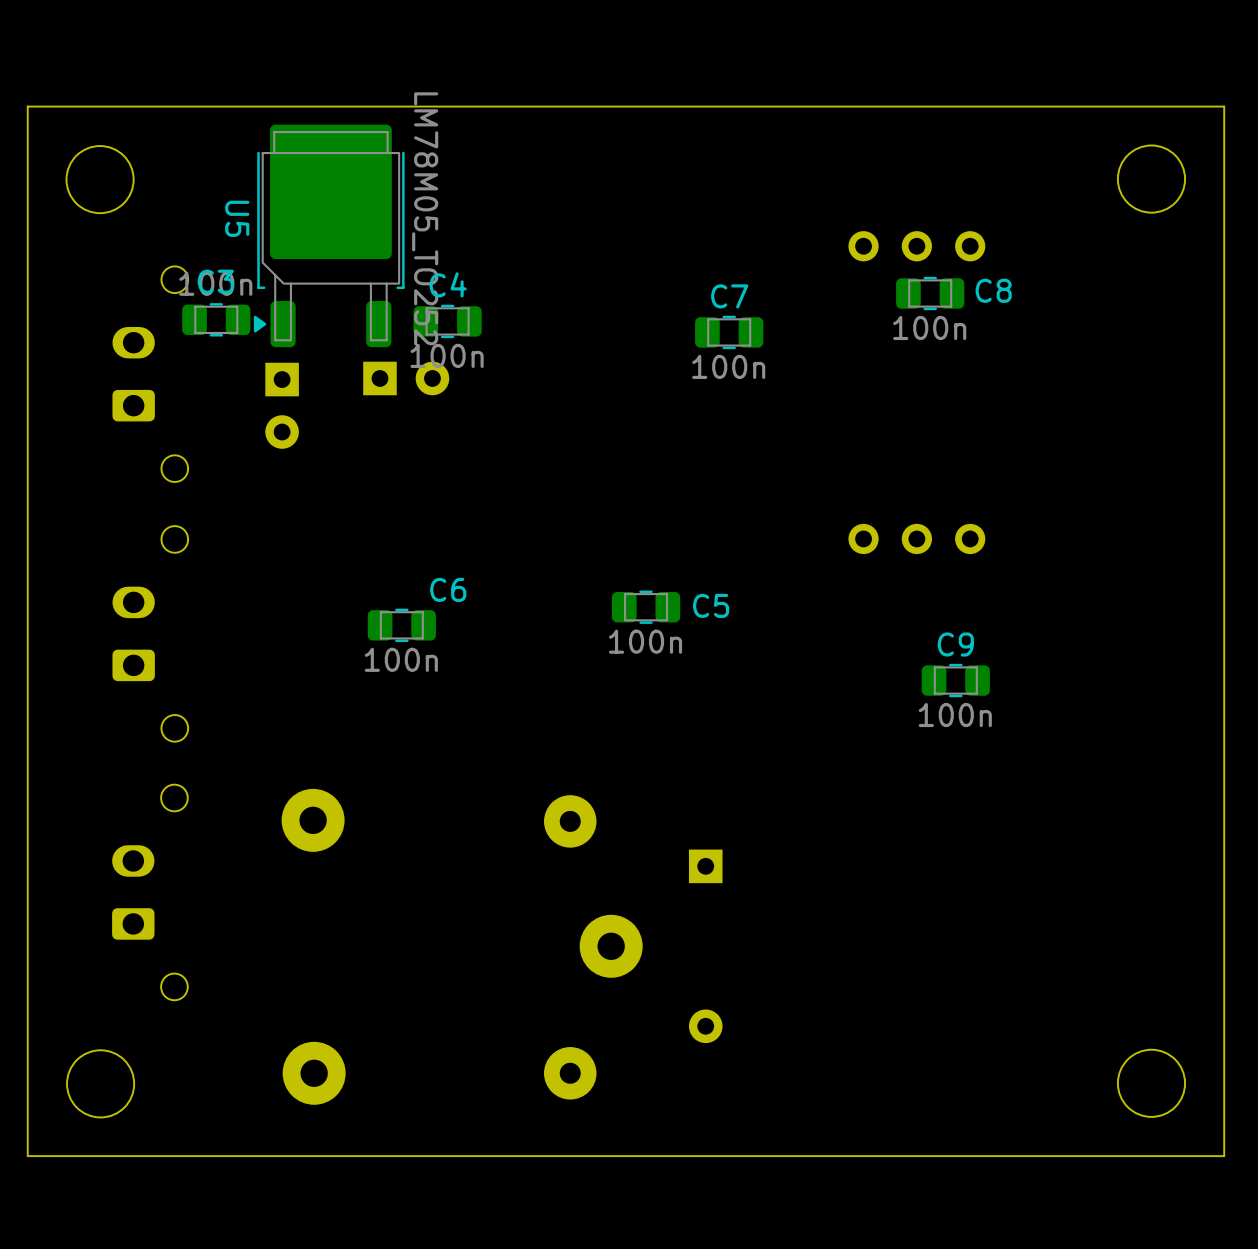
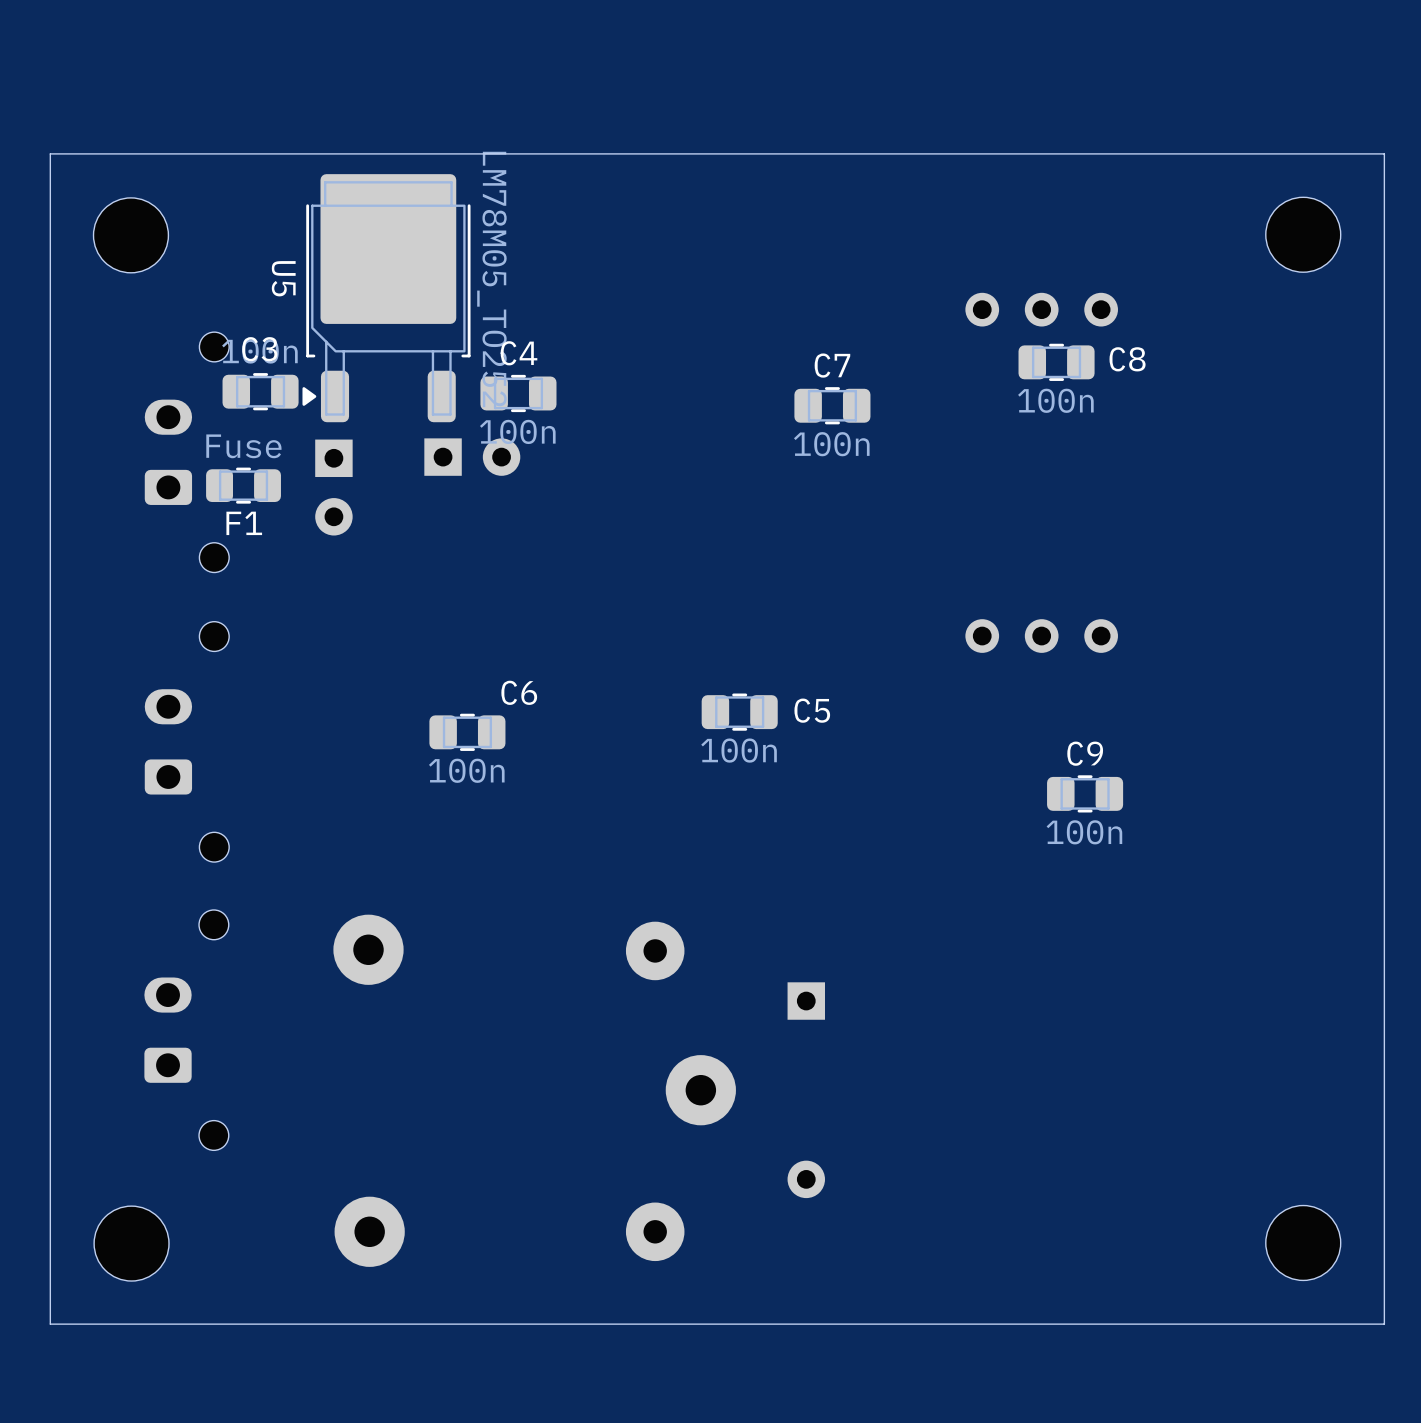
F1: none -> Fuse (243, 485)

